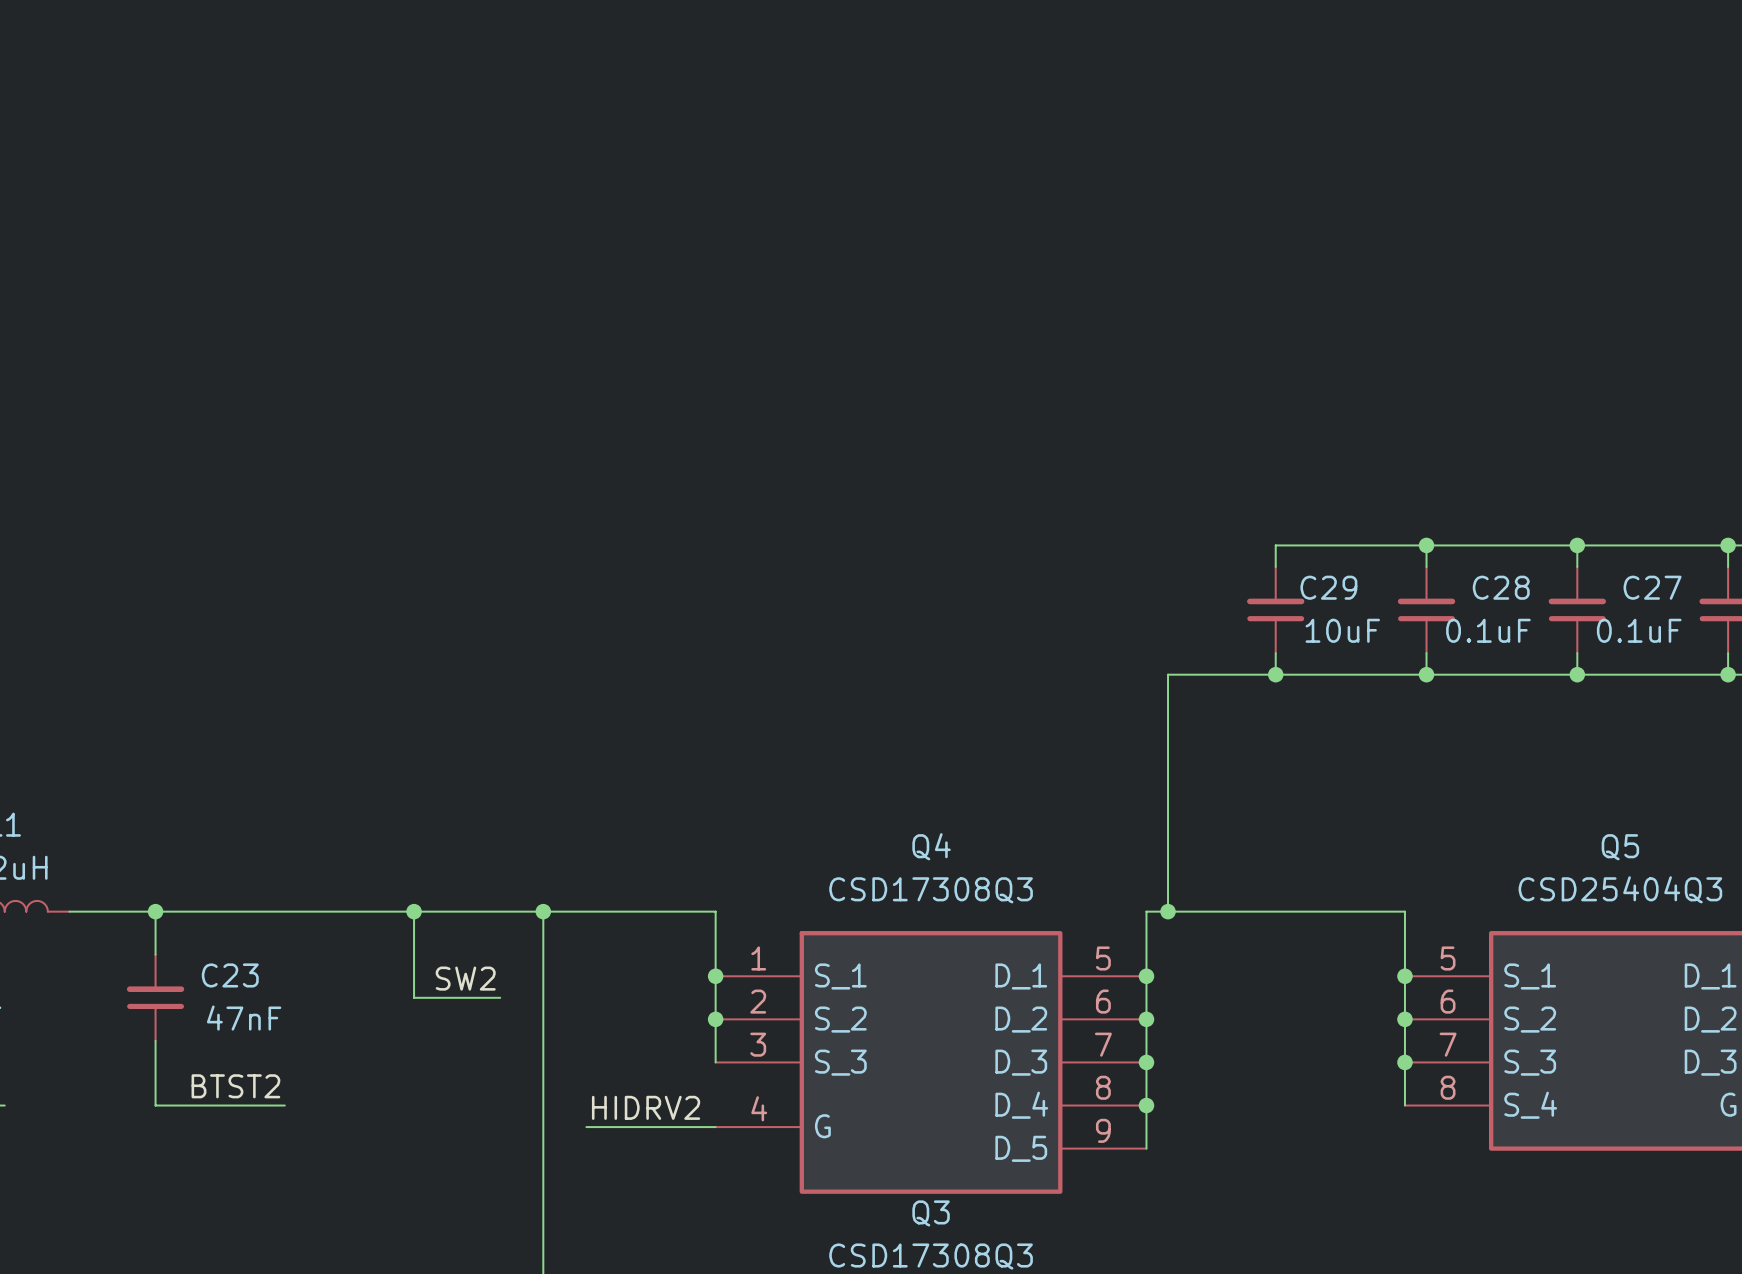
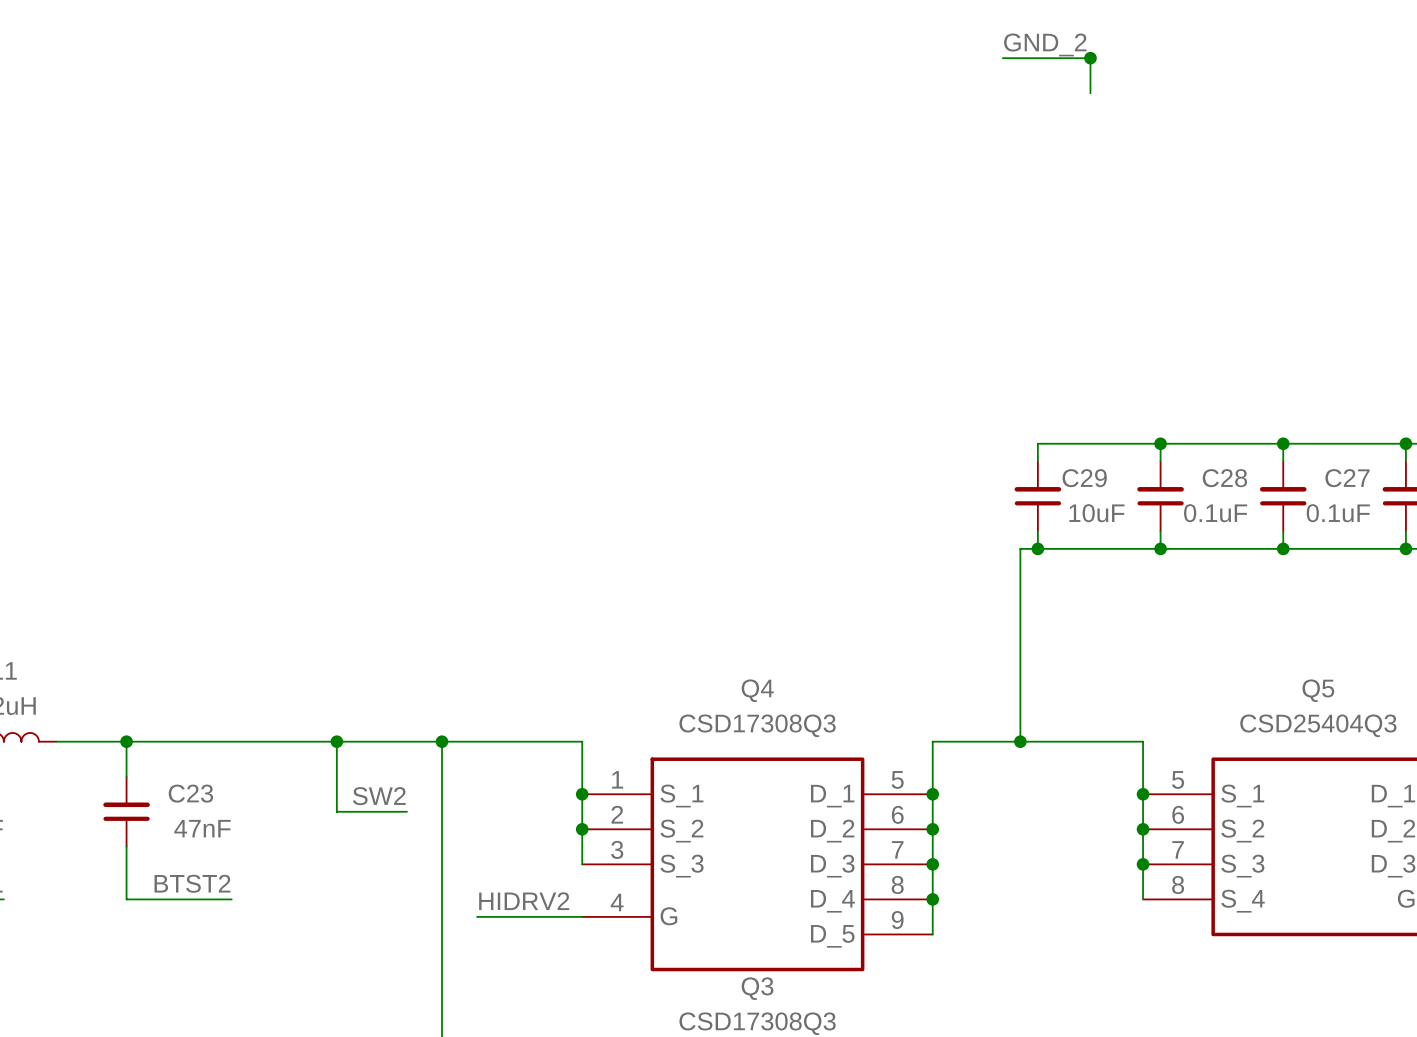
label: none -> GND_2 (1045, 44)
wire: none -> (1002, 58) (1090, 58) (1090, 93)
junction: none -> (1090, 58)
wire: (1254, 674) (1168, 674) (1168, 911) -> (1020, 548) (1020, 741)
junction position: (1168, 911) -> (1020, 741)

